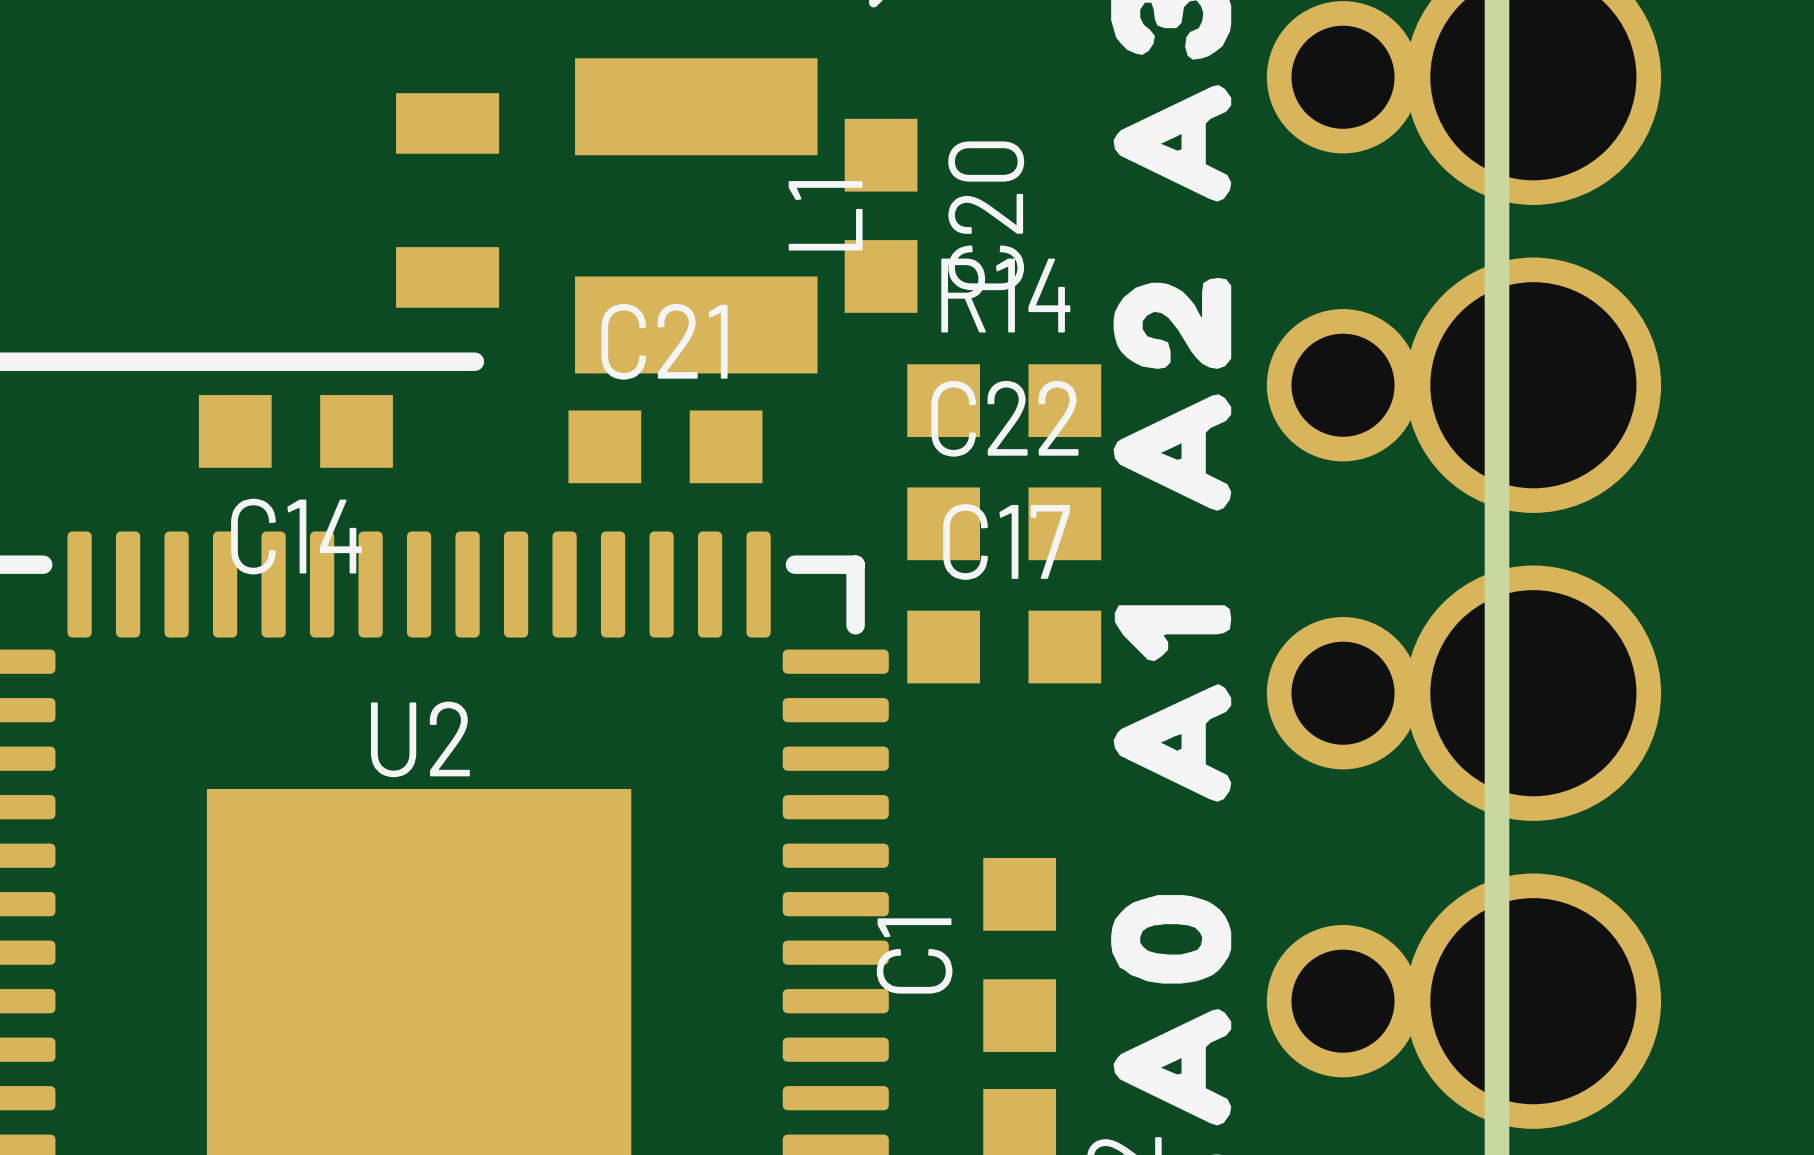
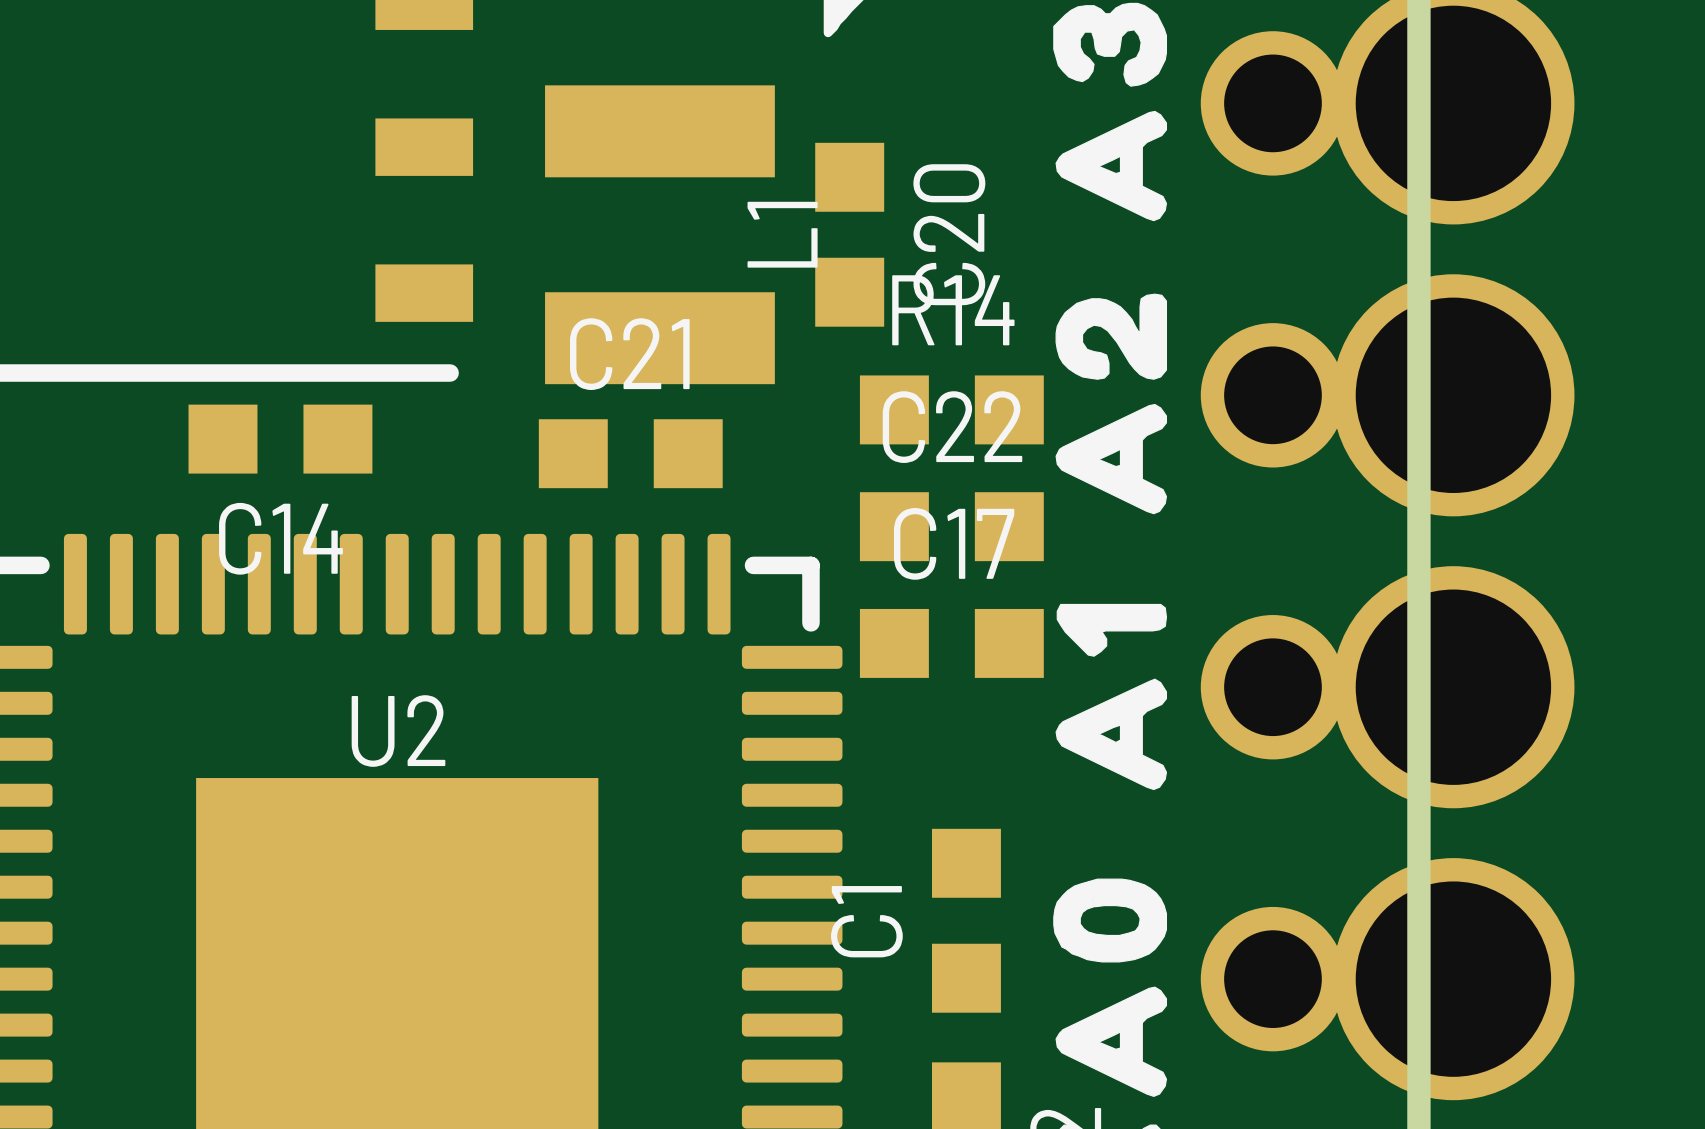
C20 position: (881, 215) -> (849, 234)
C1 position: (1019, 954) -> (966, 920)

